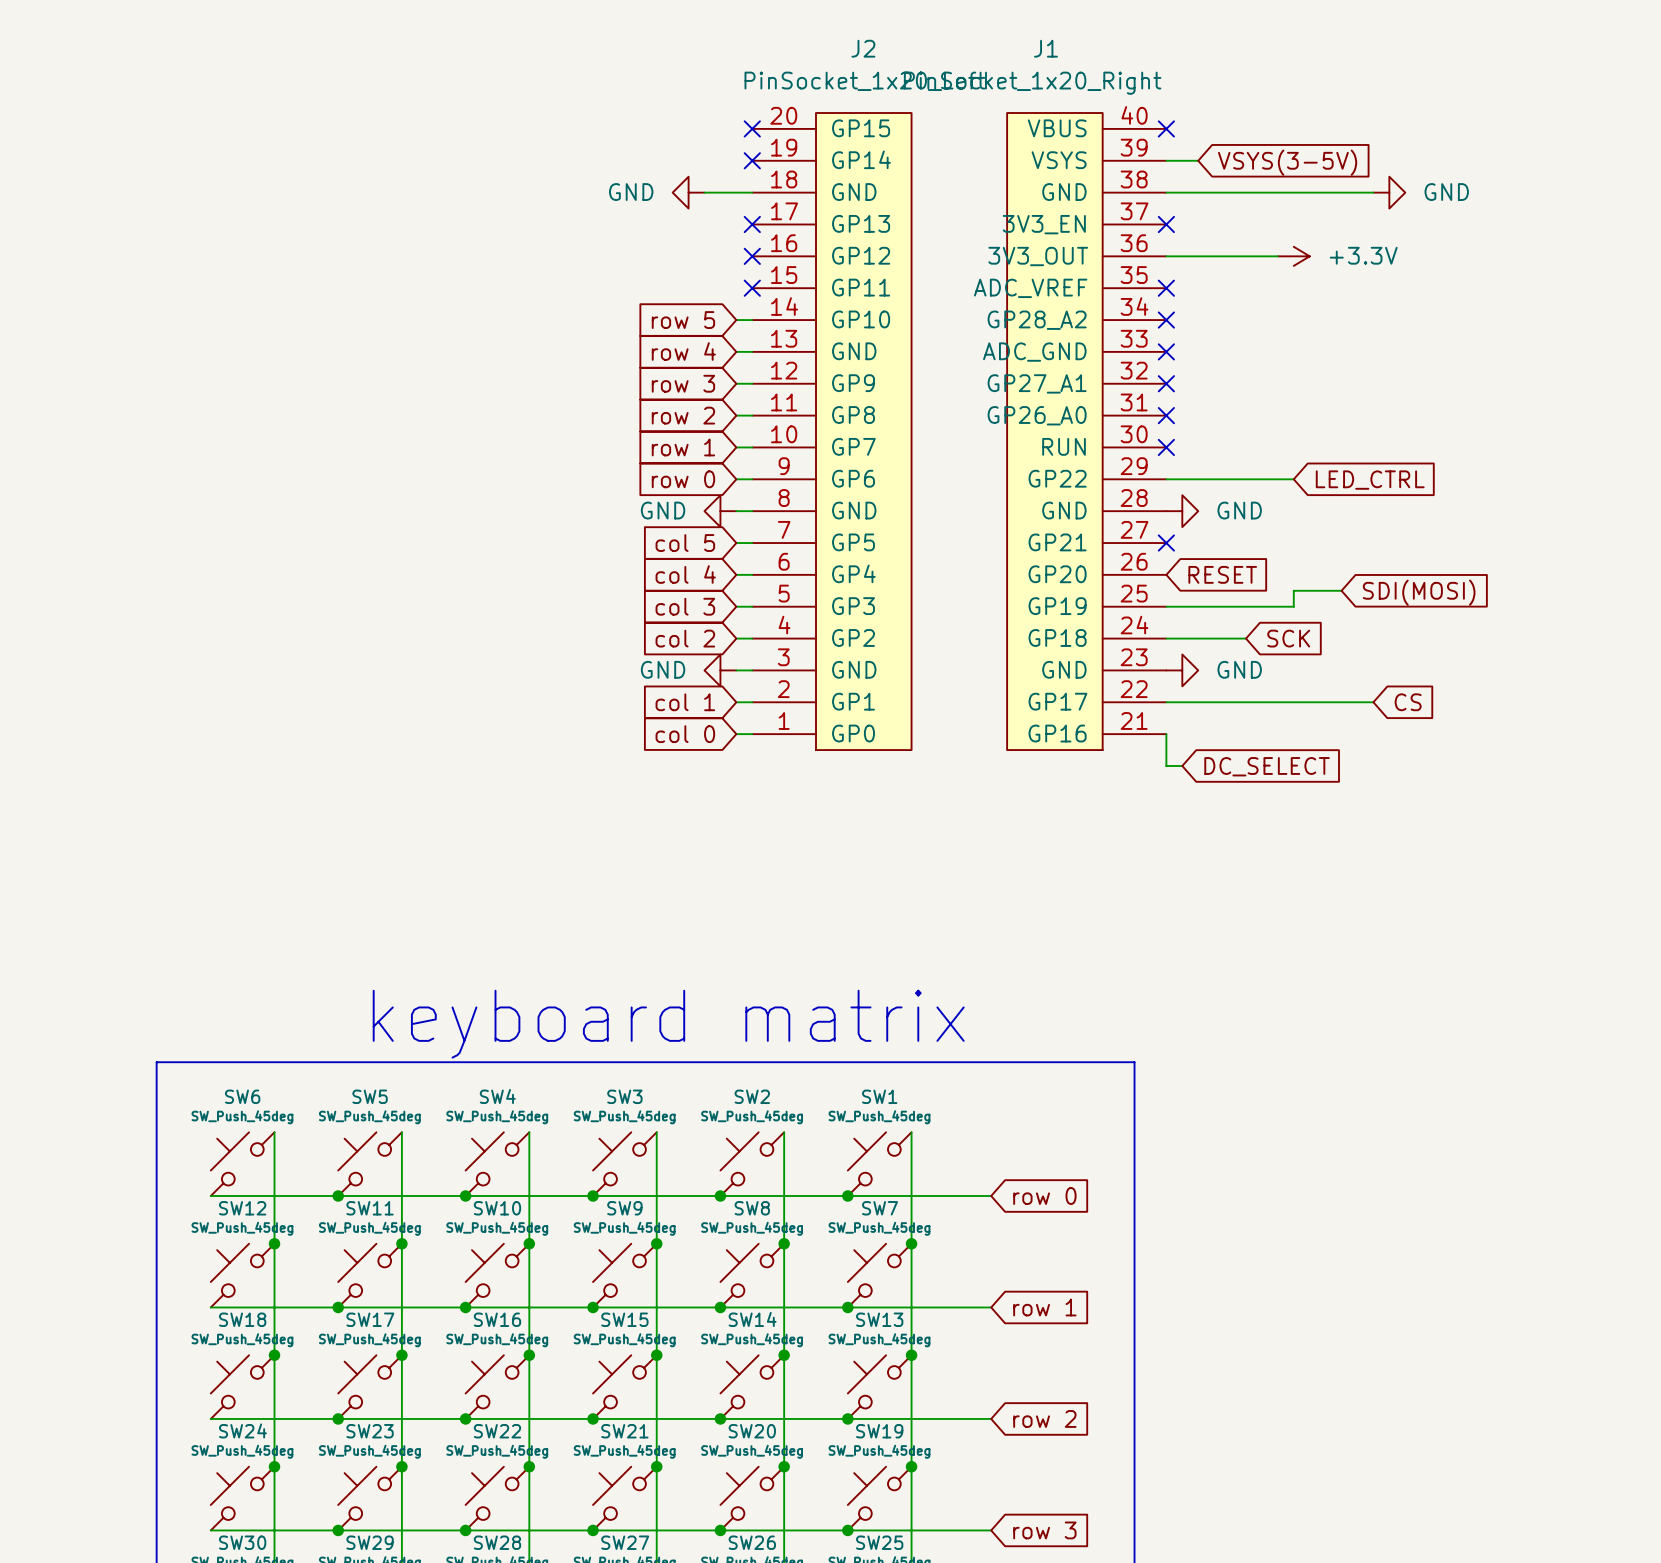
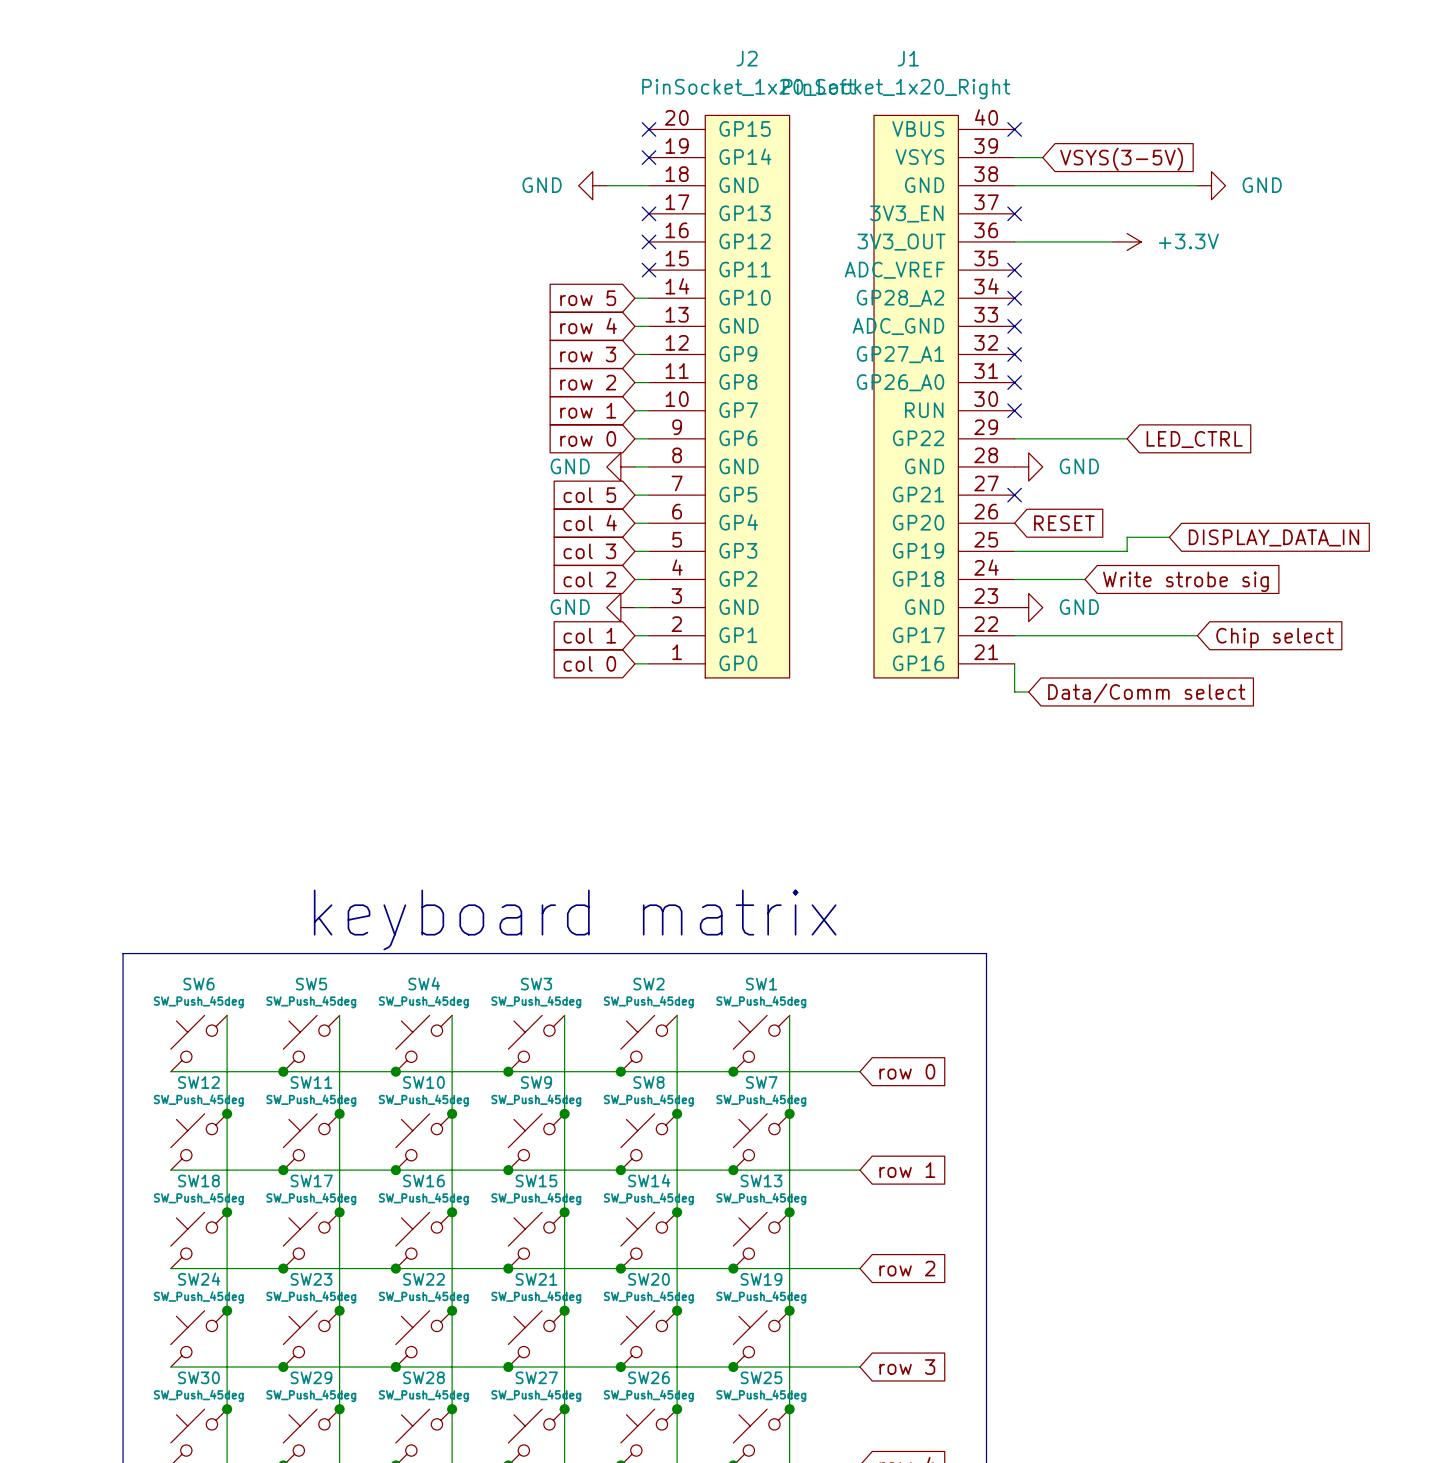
global label: SDI(MOSI) (1419, 592) -> DISPLAY_DATA_IN (1273, 537)
global label: SCK (1288, 638) -> Write strobe sig (1185, 581)
global label: CS (1408, 702) -> Chip select (1274, 638)
global label: DC_SELECT (1267, 766) -> Data/Comm select (1146, 693)

